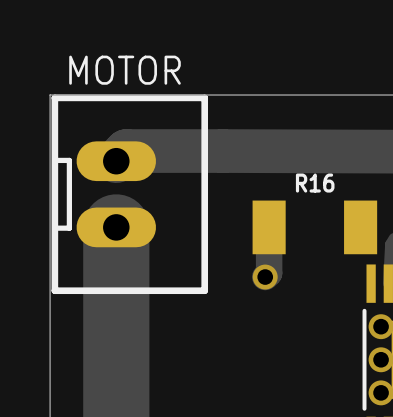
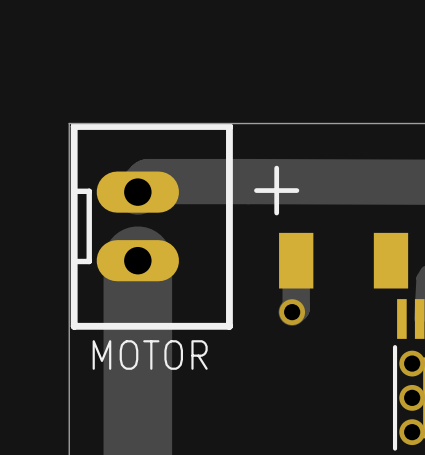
MOTOR name: MOTOR (125, 70) -> none
text: none -> + (276, 190)
R16 name: R16 (315, 183) -> none
text: none -> MOTOR (150, 355)

